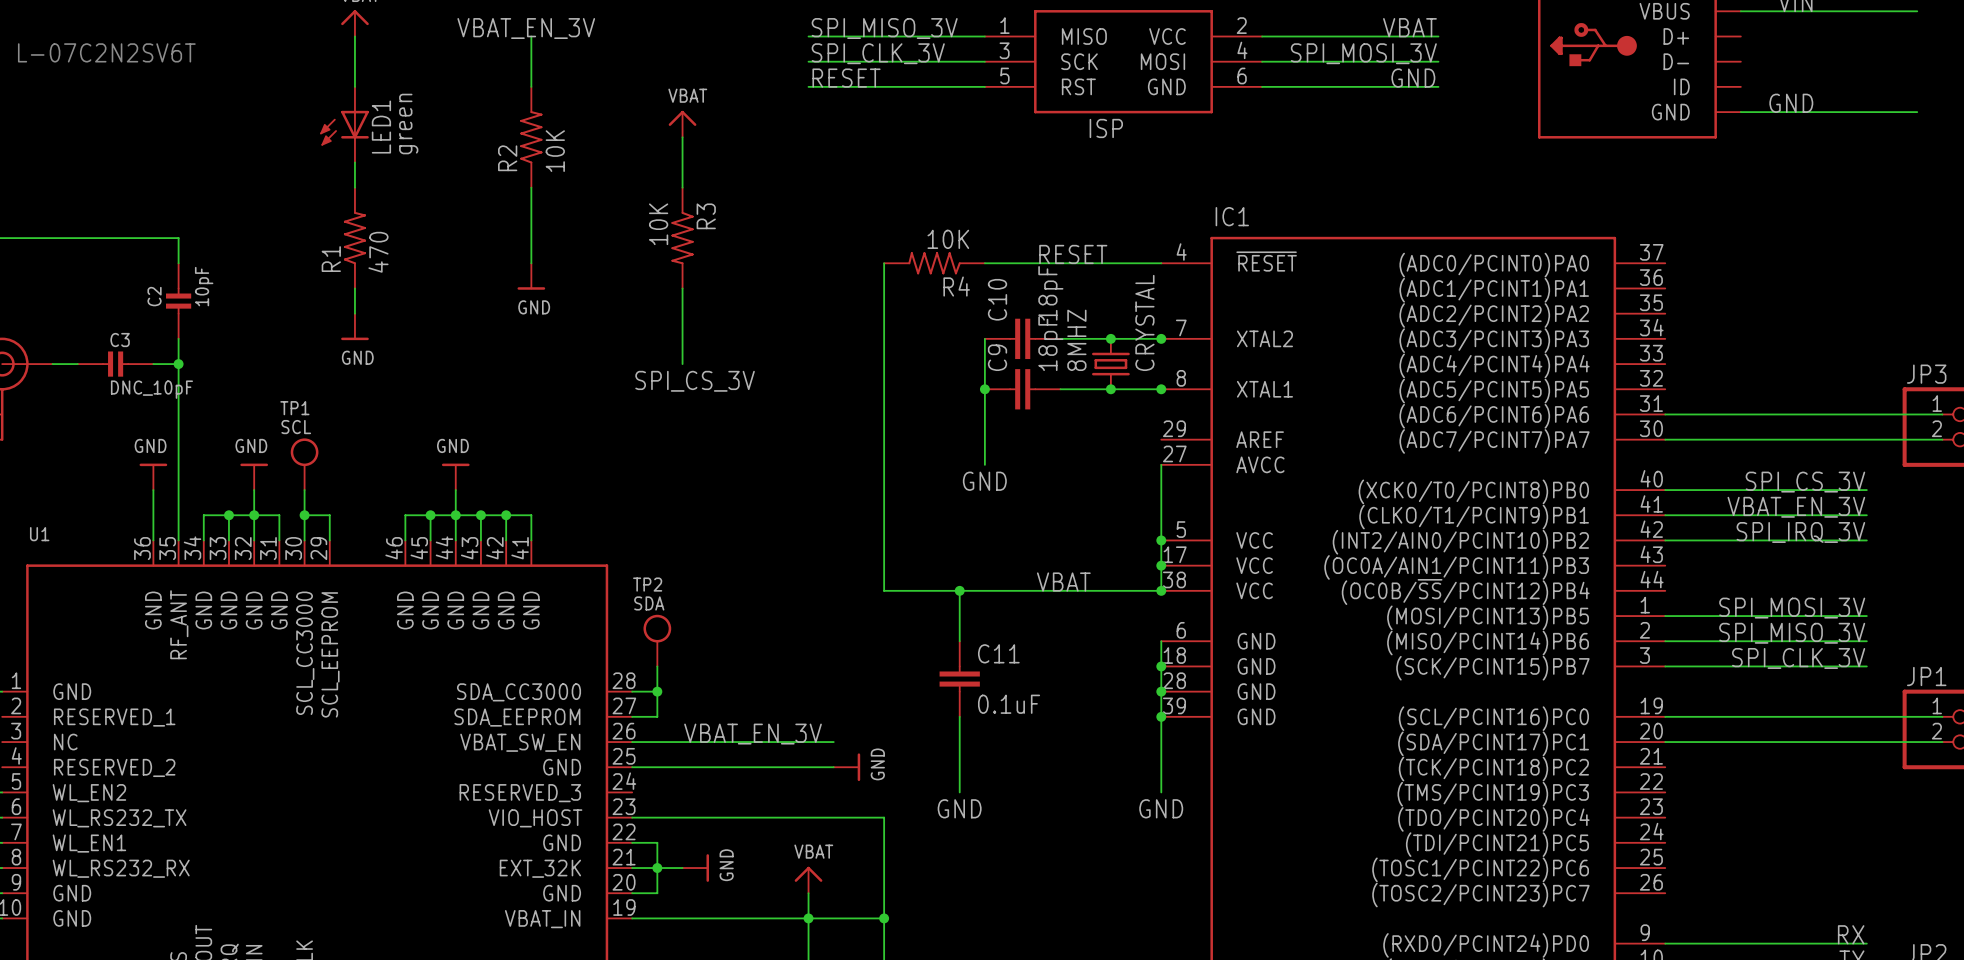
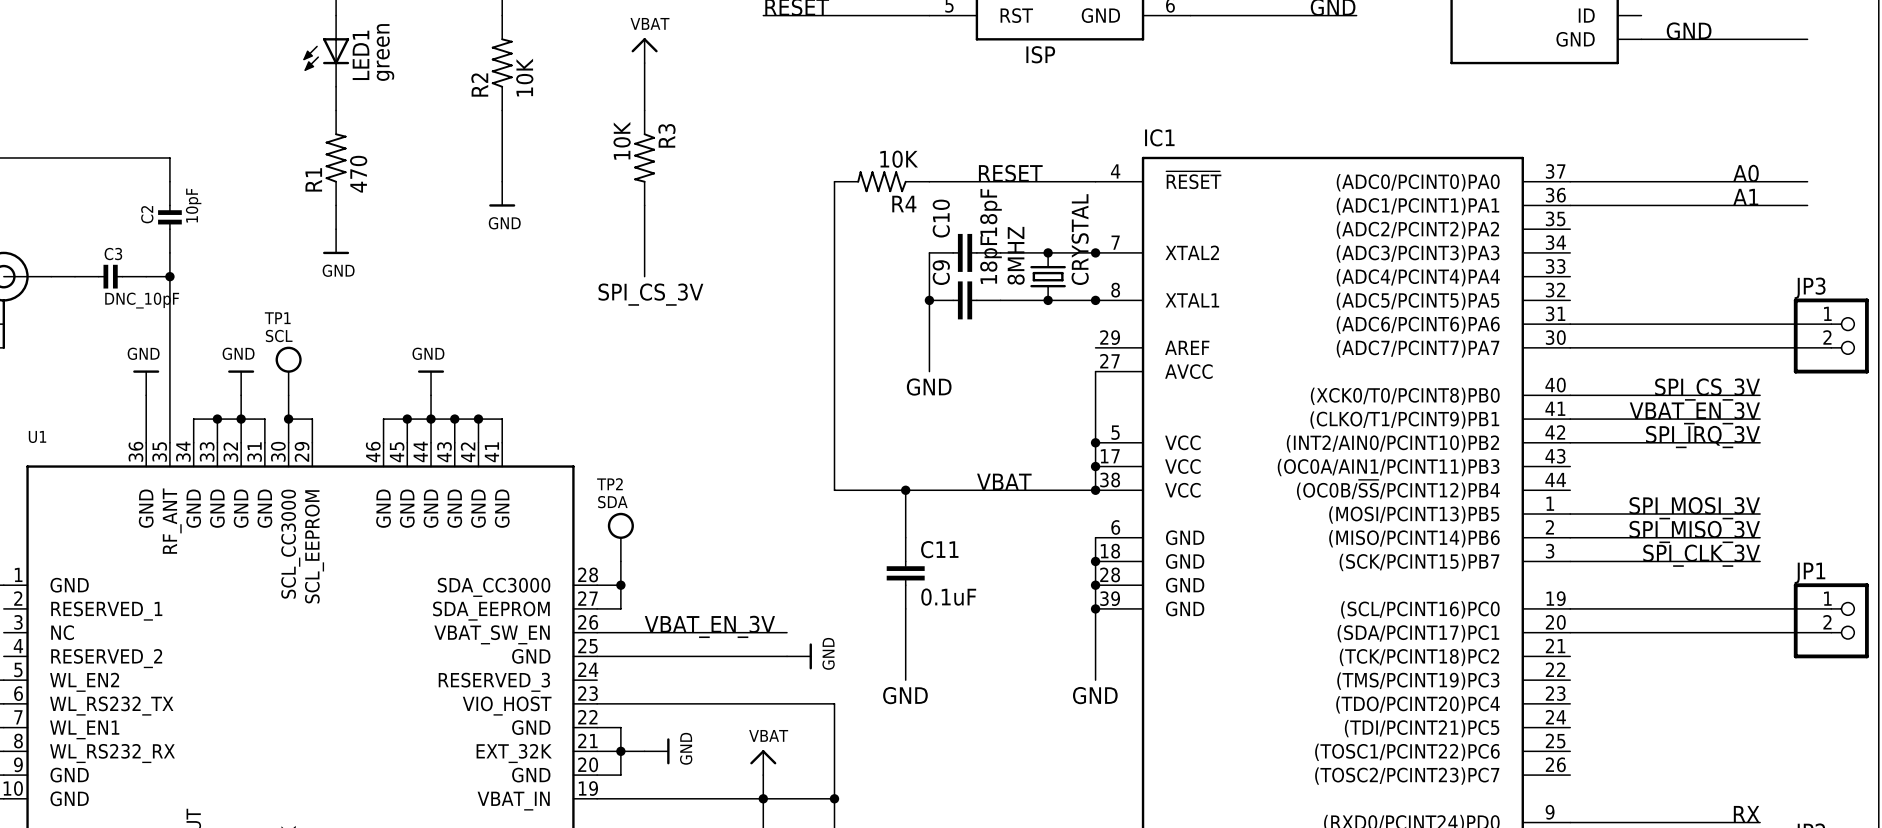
label: none -> A0 (1745, 173)
wire: none -> (1570, 181) (1807, 181)
label: none -> A1 (1745, 197)
wire: none -> (1570, 205) (1807, 205)

